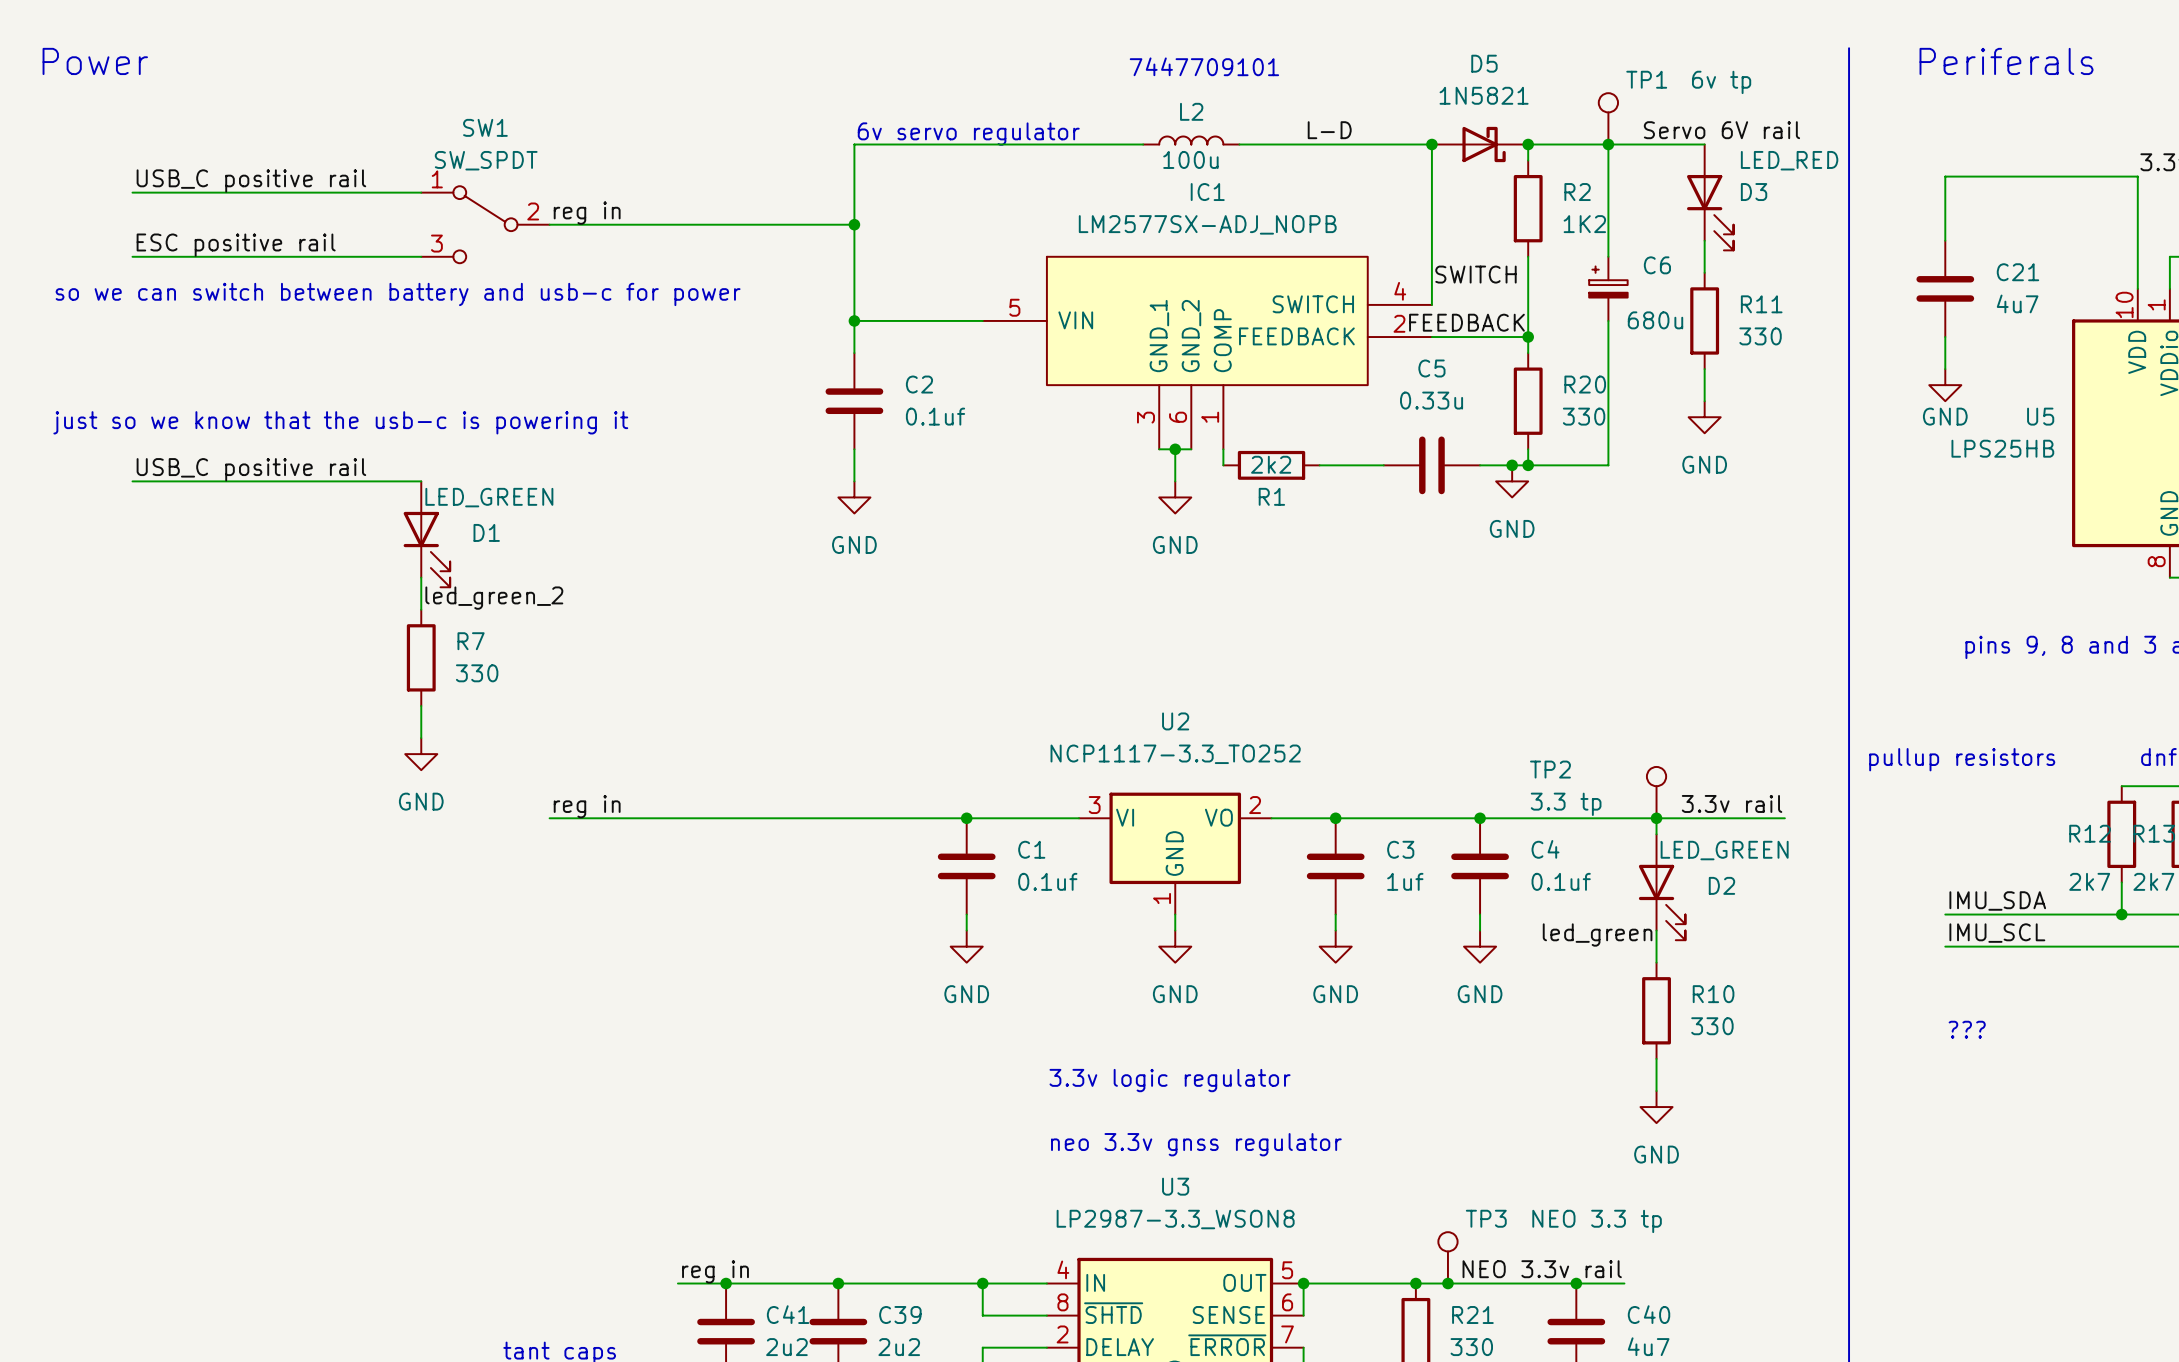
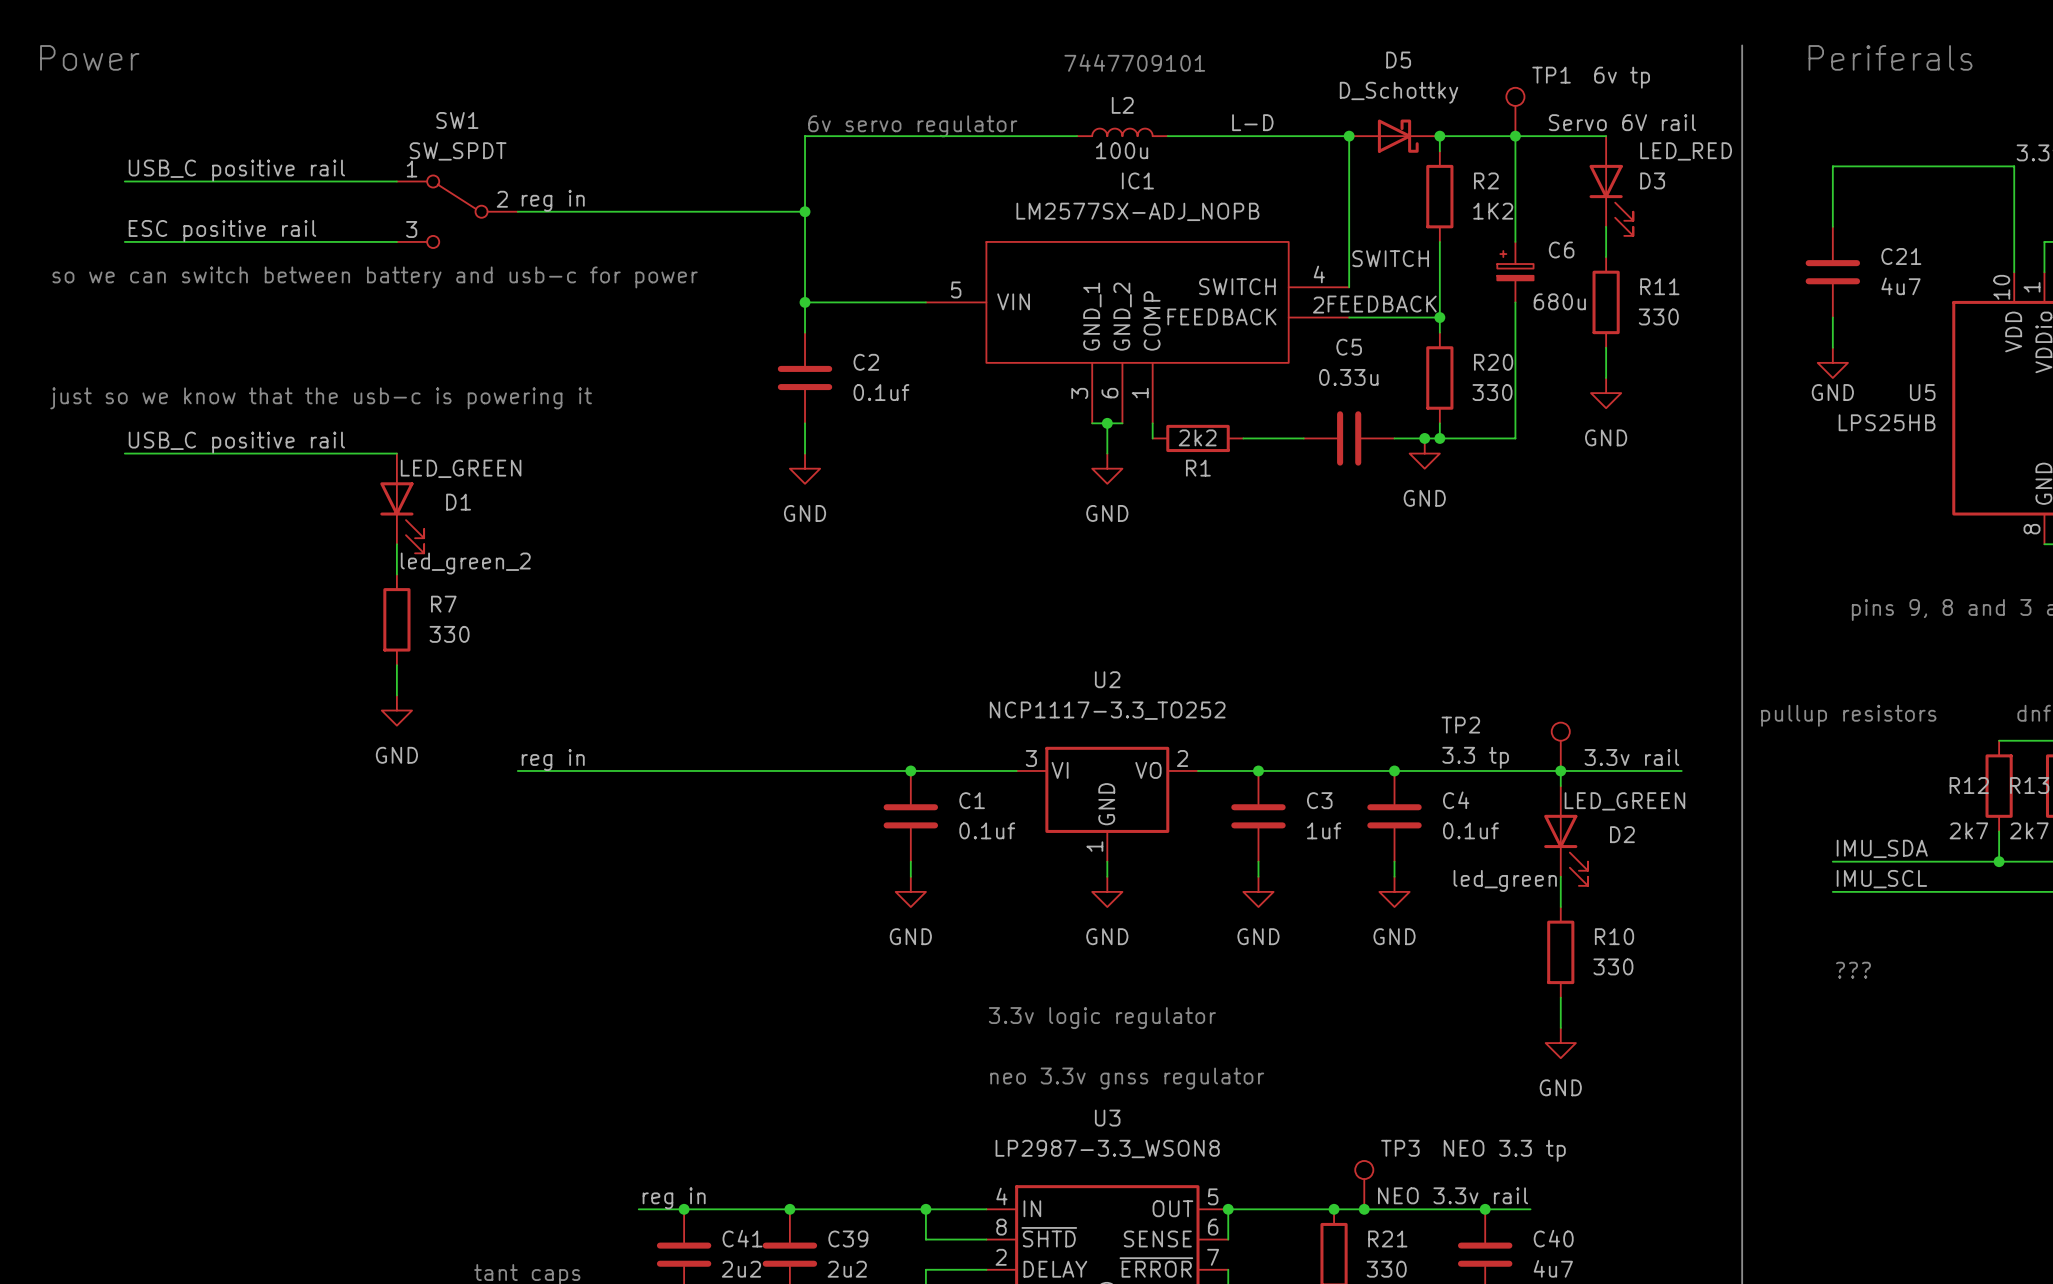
D5 value: 1N5821 (1484, 95) -> D_Schottky (1399, 92)

